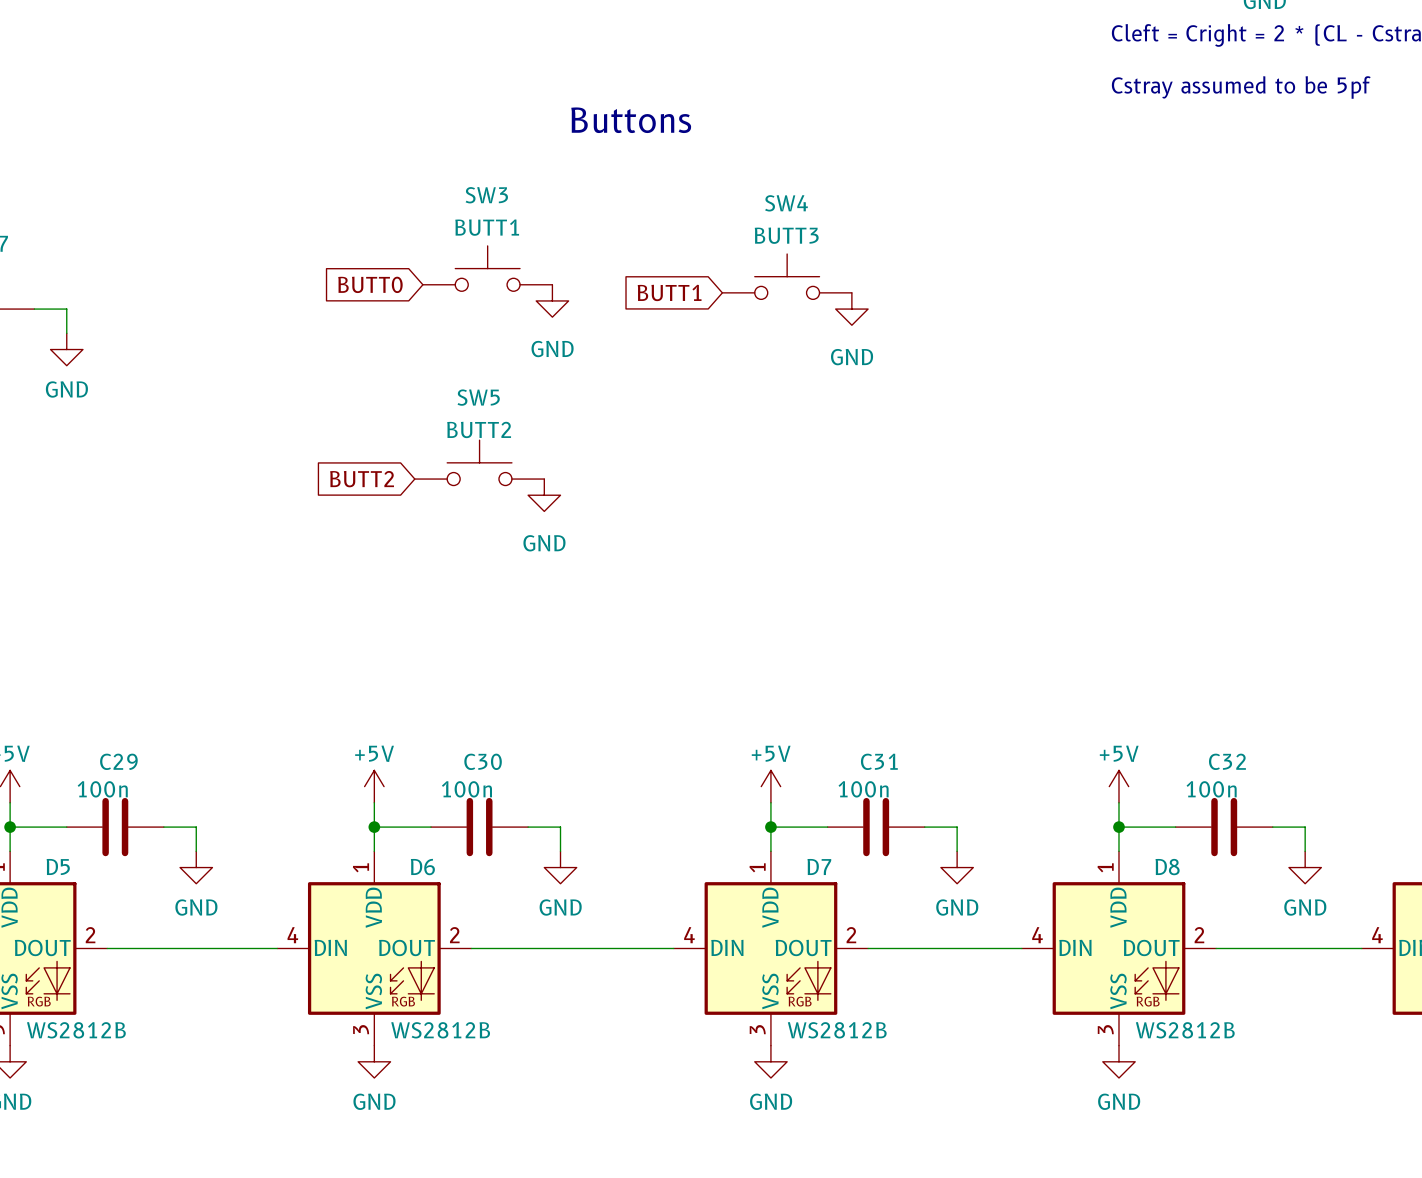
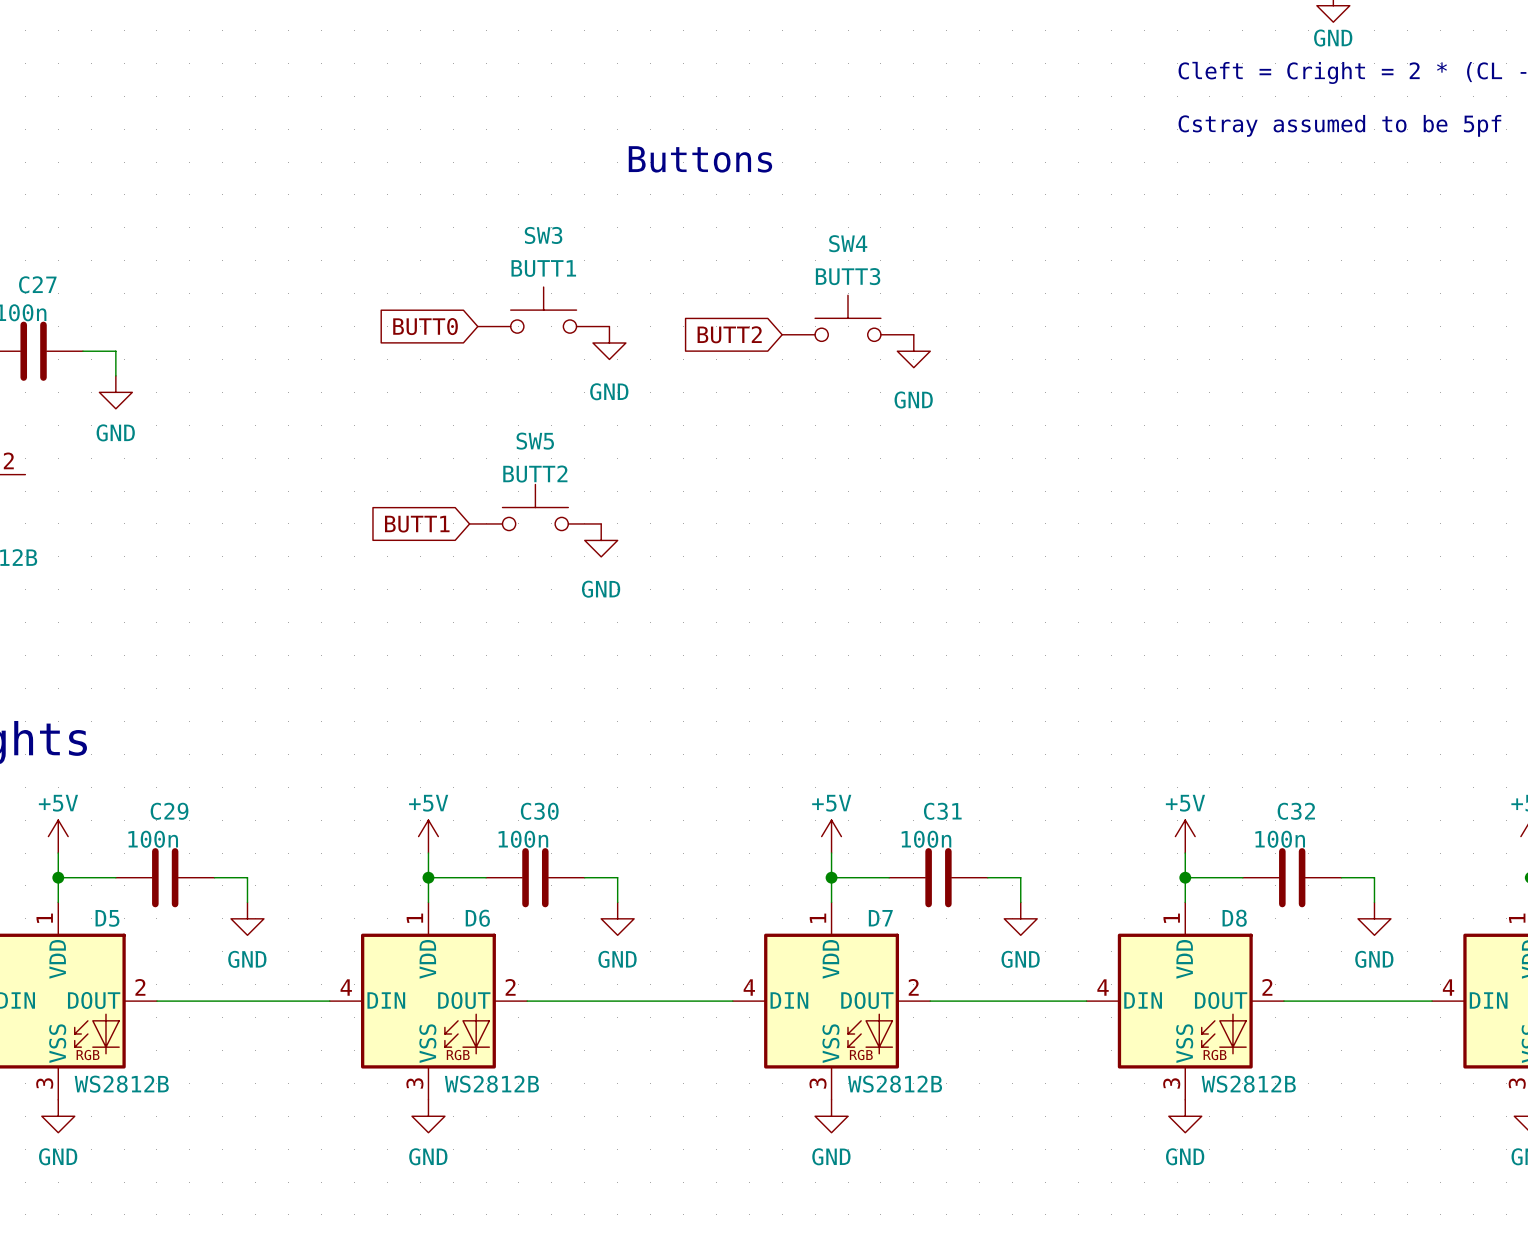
global label: BUTT1 (669, 292) -> BUTT2 (729, 334)
global label: BUTT2 (362, 479) -> BUTT1 (417, 524)

